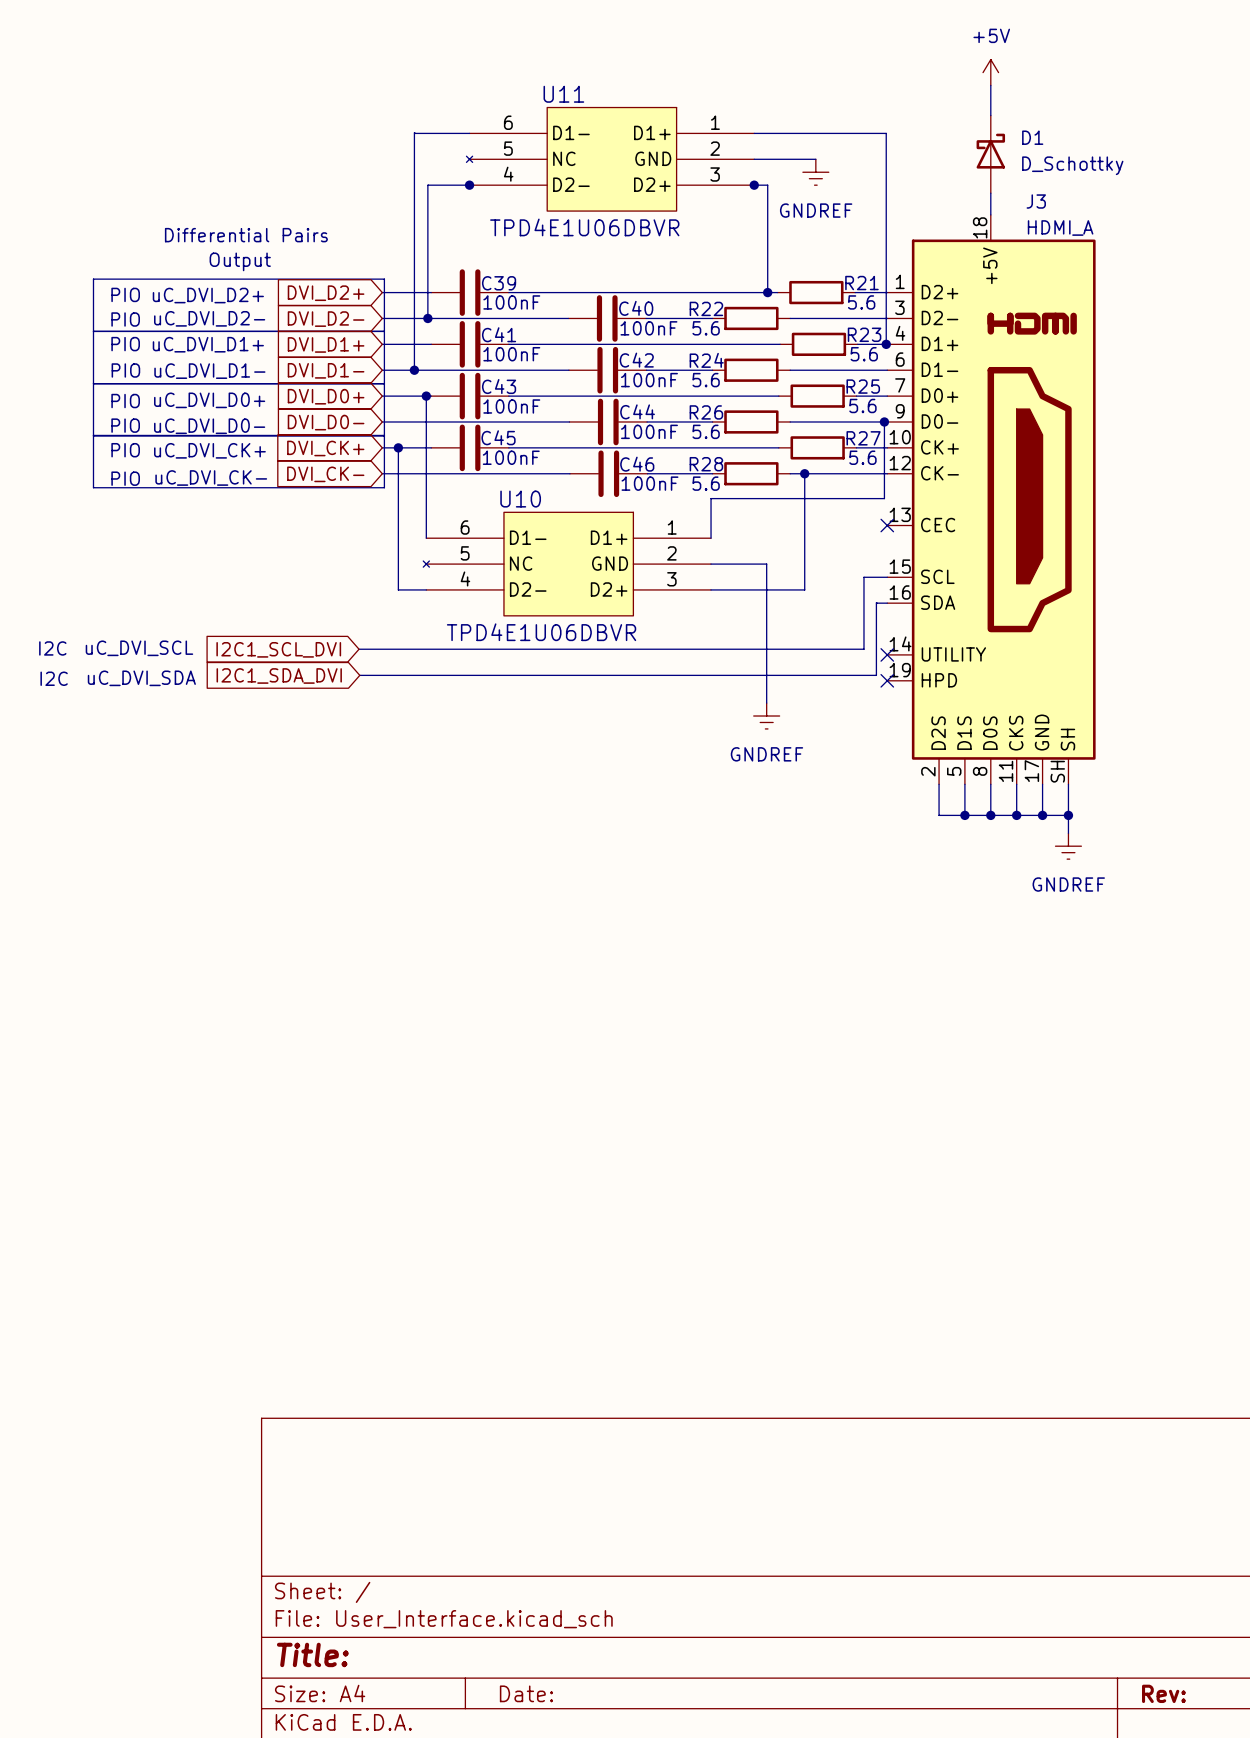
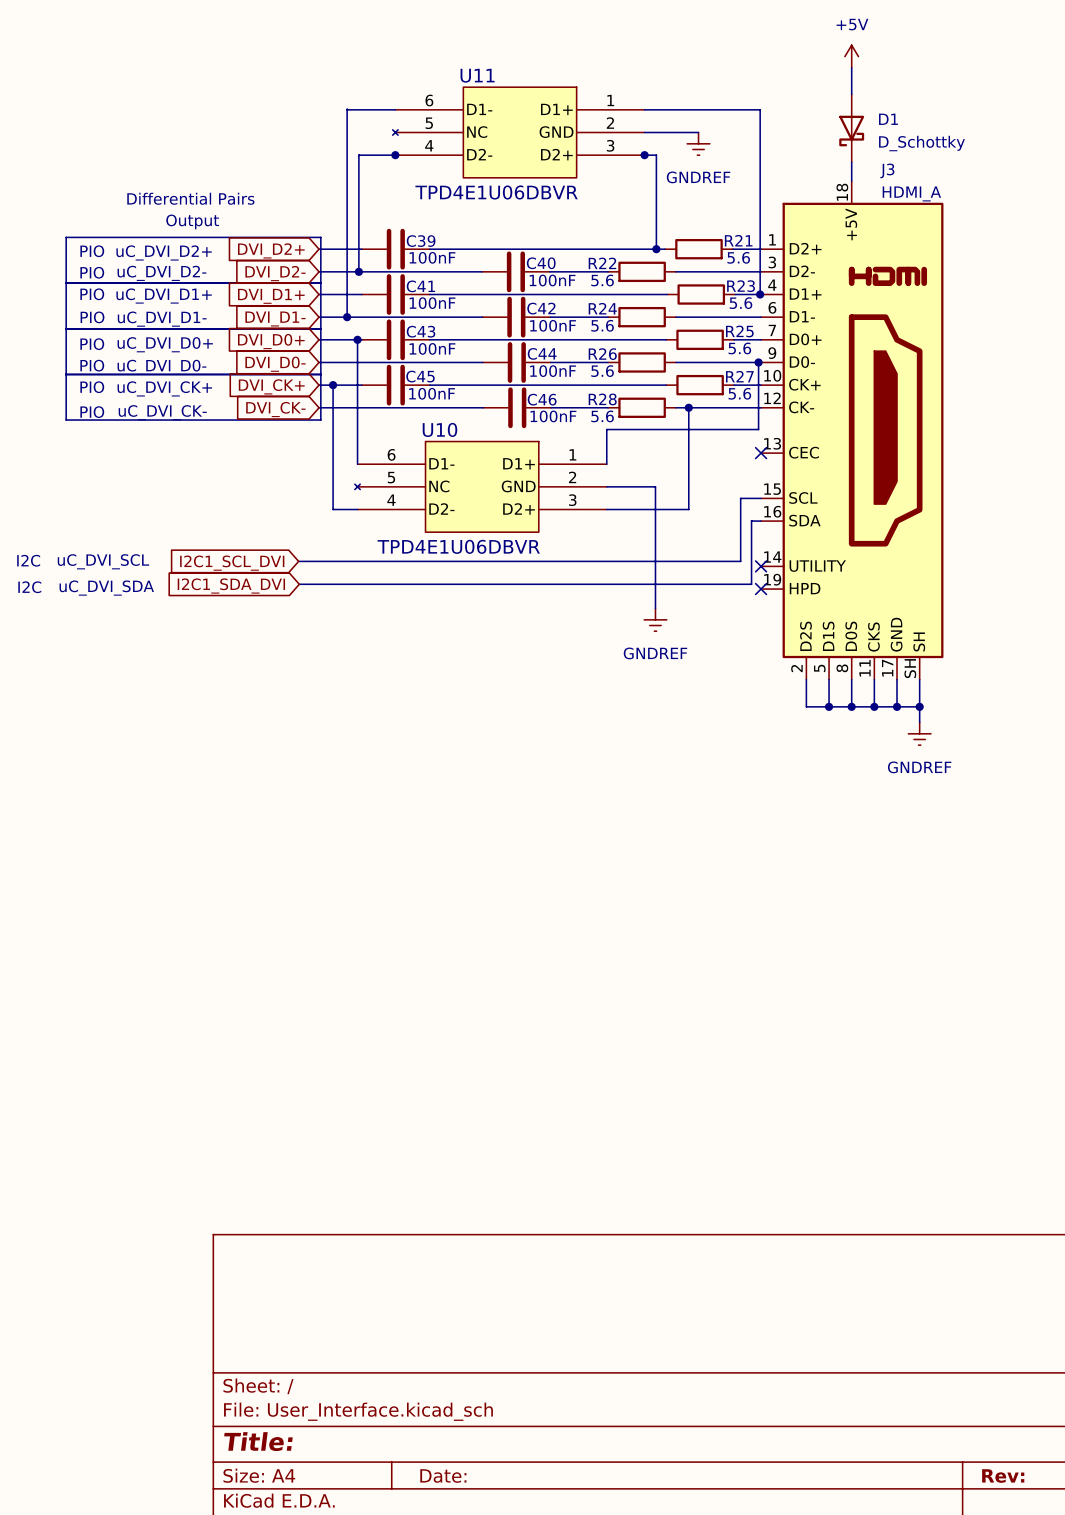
D1 rotation: 0° (990, 151) -> 180° (851, 131)

